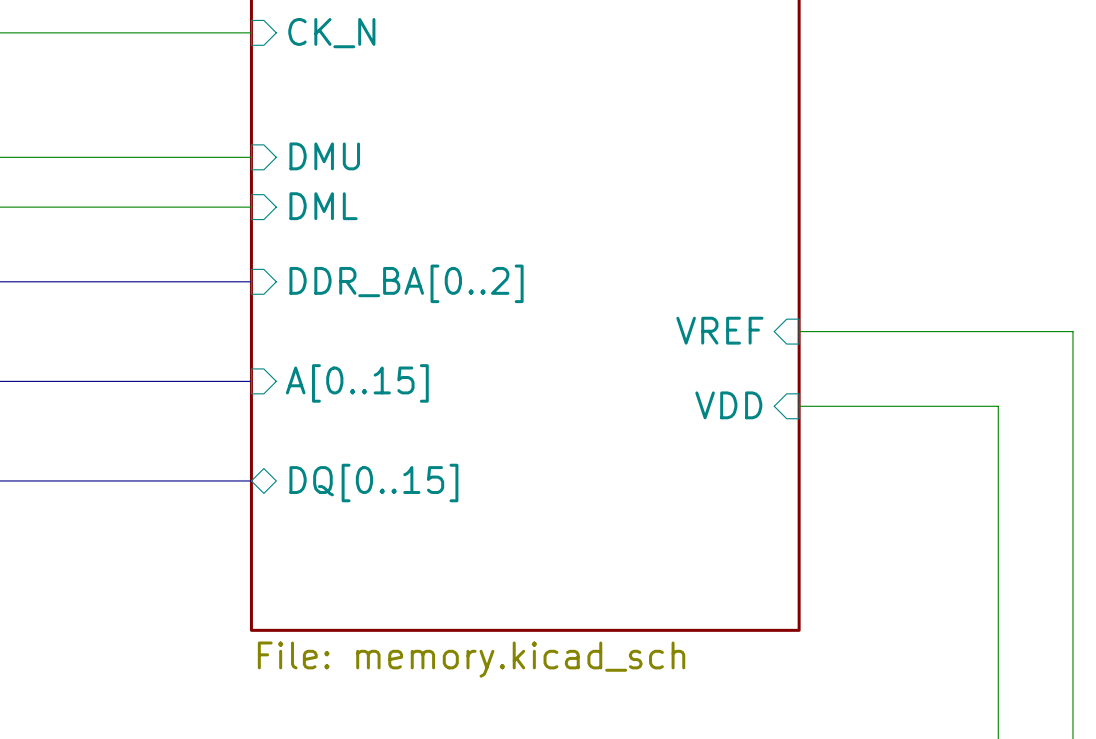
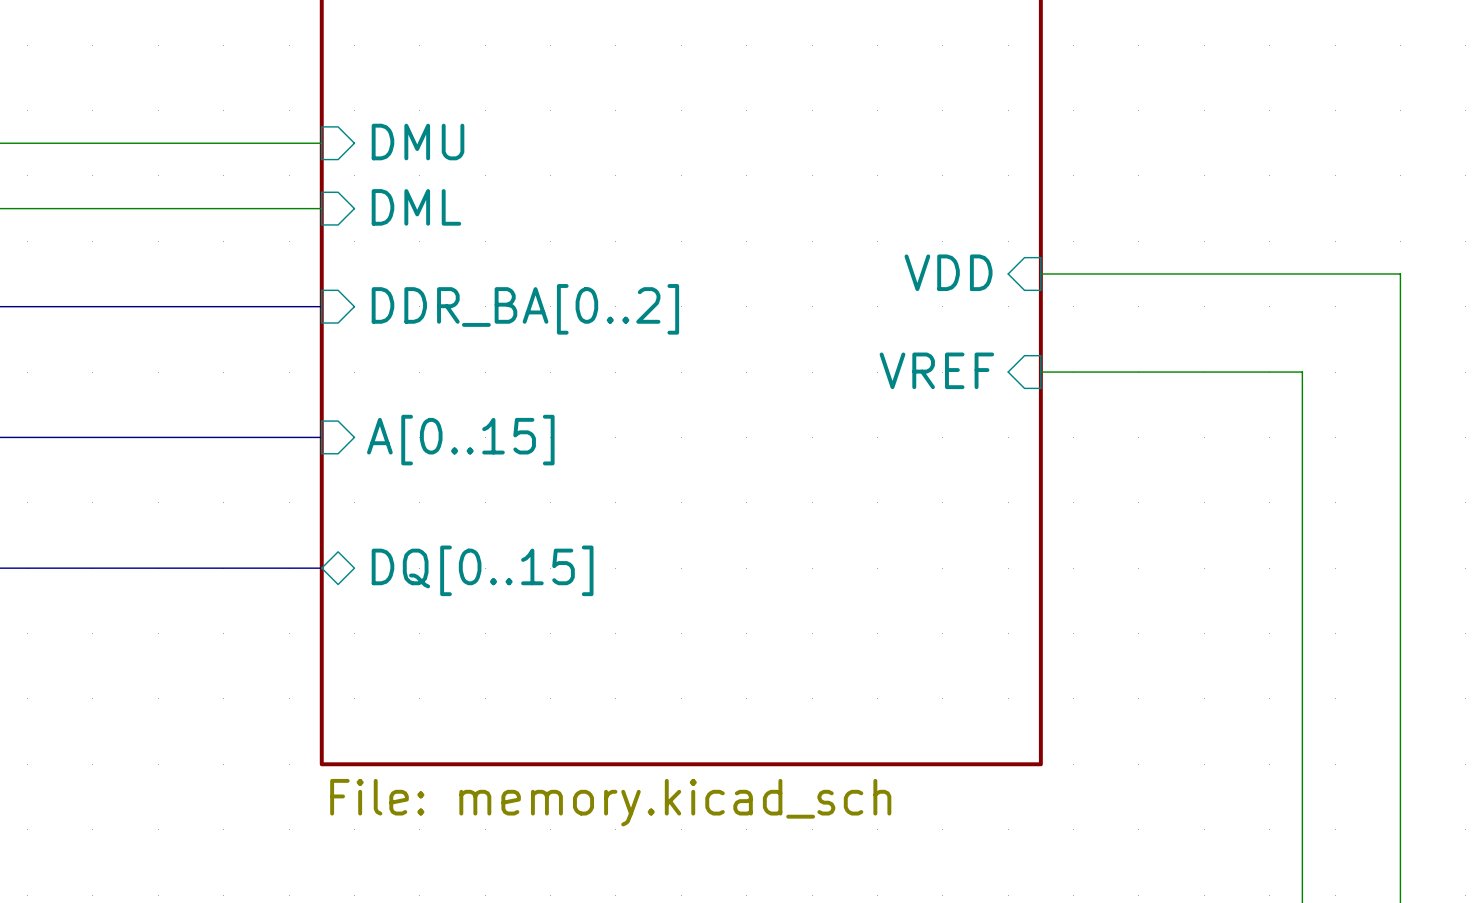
wire: none -> (1040, 273) (1400, 273) (1400, 372)
wire: (998, 331) (1072, 331) -> (1302, 372) (1302, 470)
sheet pin position: VDD (728, 405) -> VDD (948, 272)
wire: (799, 406) (998, 406) -> none

